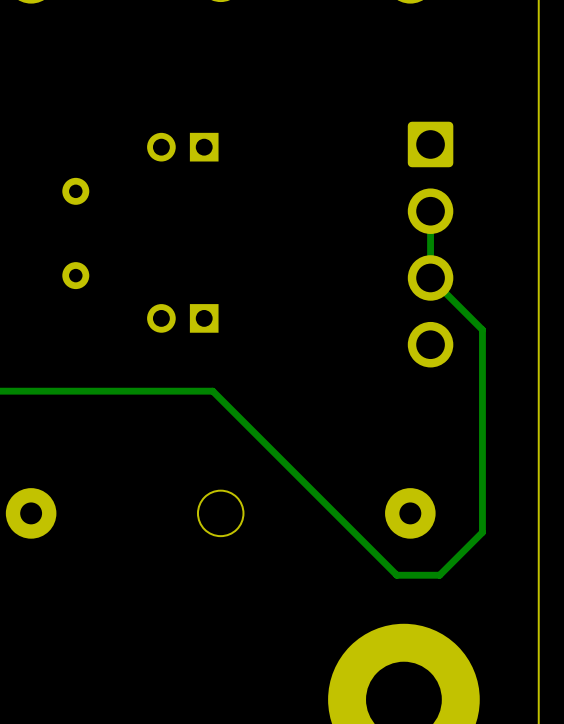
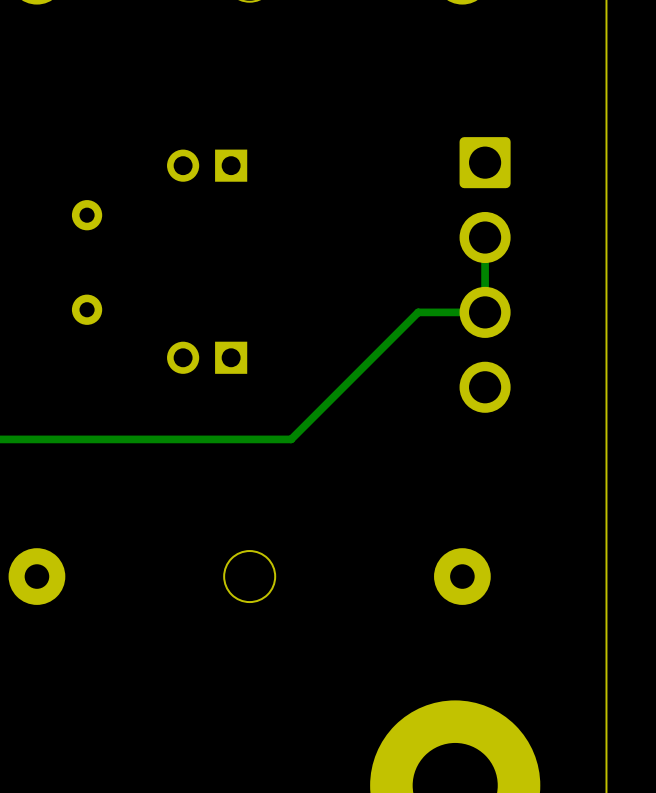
track: (430, 277) (482, 329) (482, 532) (439, 575) (396, 575) (212, 391) -> (485, 312) (418, 312) (291, 439) (240, 439)

